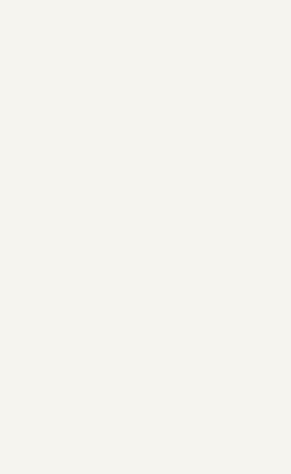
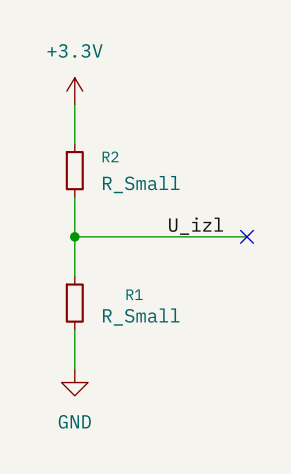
power symbol: none -> +3.3V (74, 91)
wire: none -> (74, 104) (74, 144)
R2: none -> R_Small (74, 170)
wire: none -> (74, 197) (74, 276)
label: none -> U_izl (195, 226)
wire: none -> (74, 236) (246, 236)
junction: none -> (74, 236)
no-connect mark: none -> (246, 236)
R1: none -> R_Small (74, 303)
wire: none -> (74, 329) (74, 369)
power symbol: none -> GND (74, 382)

